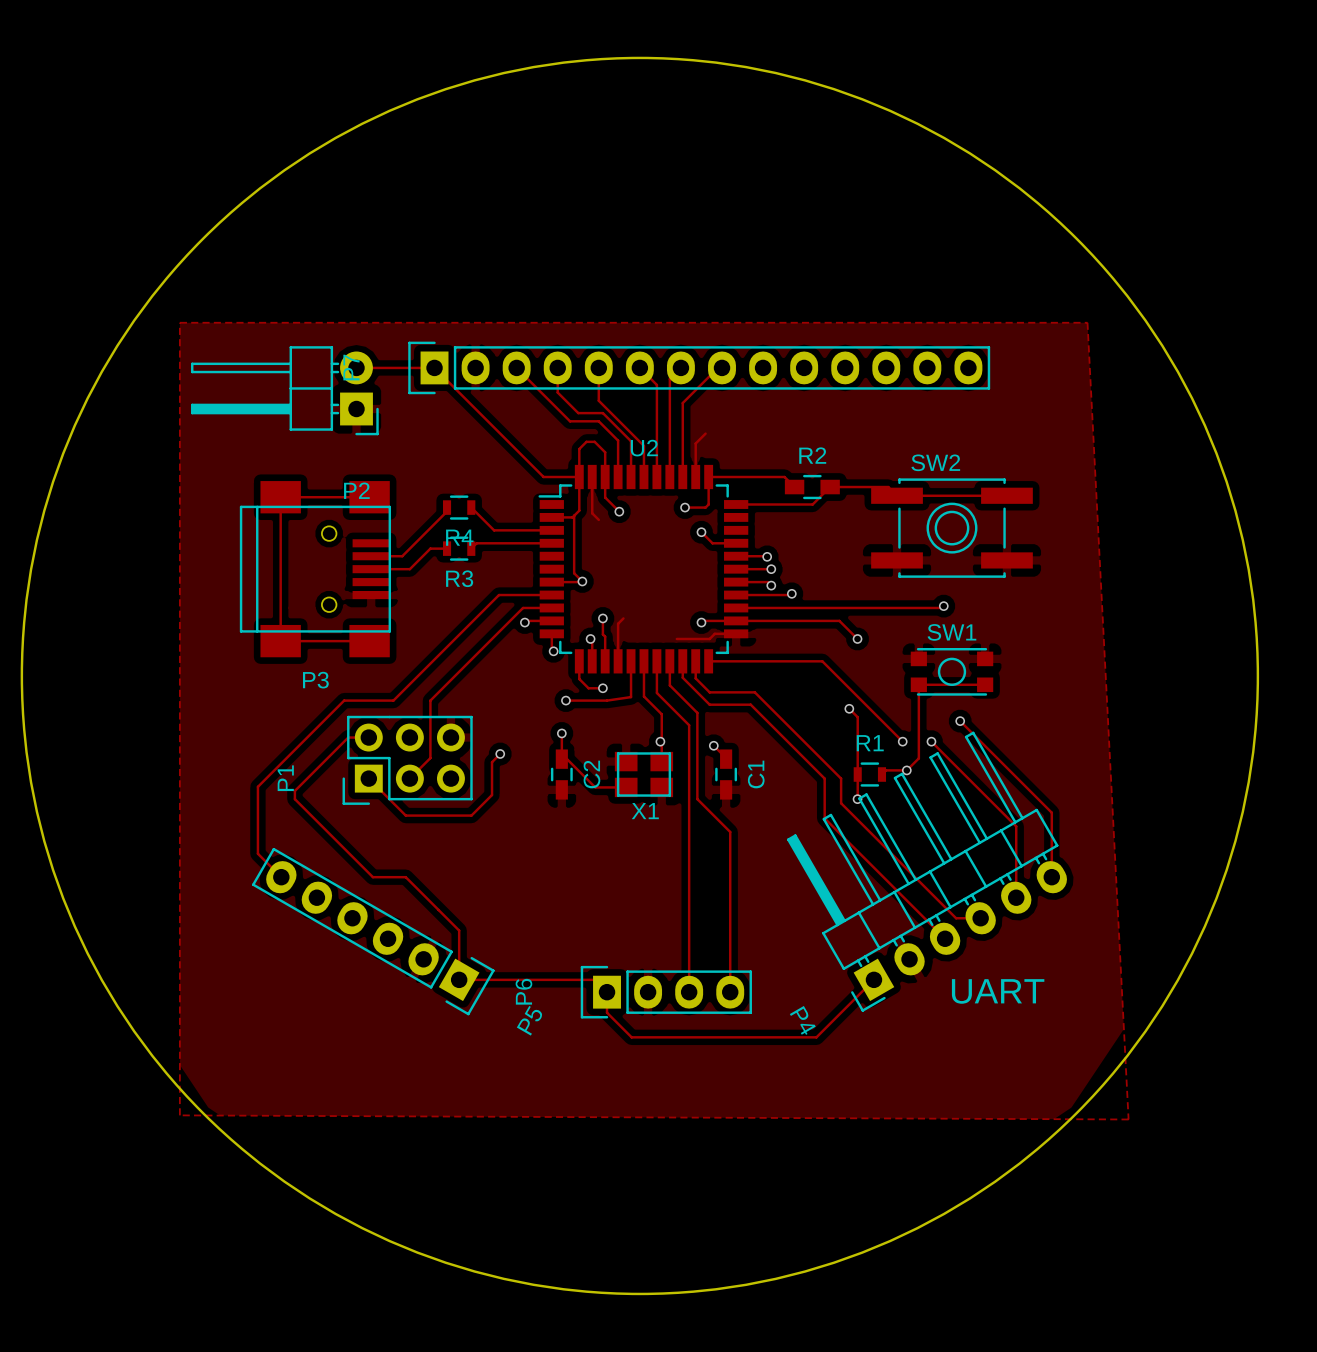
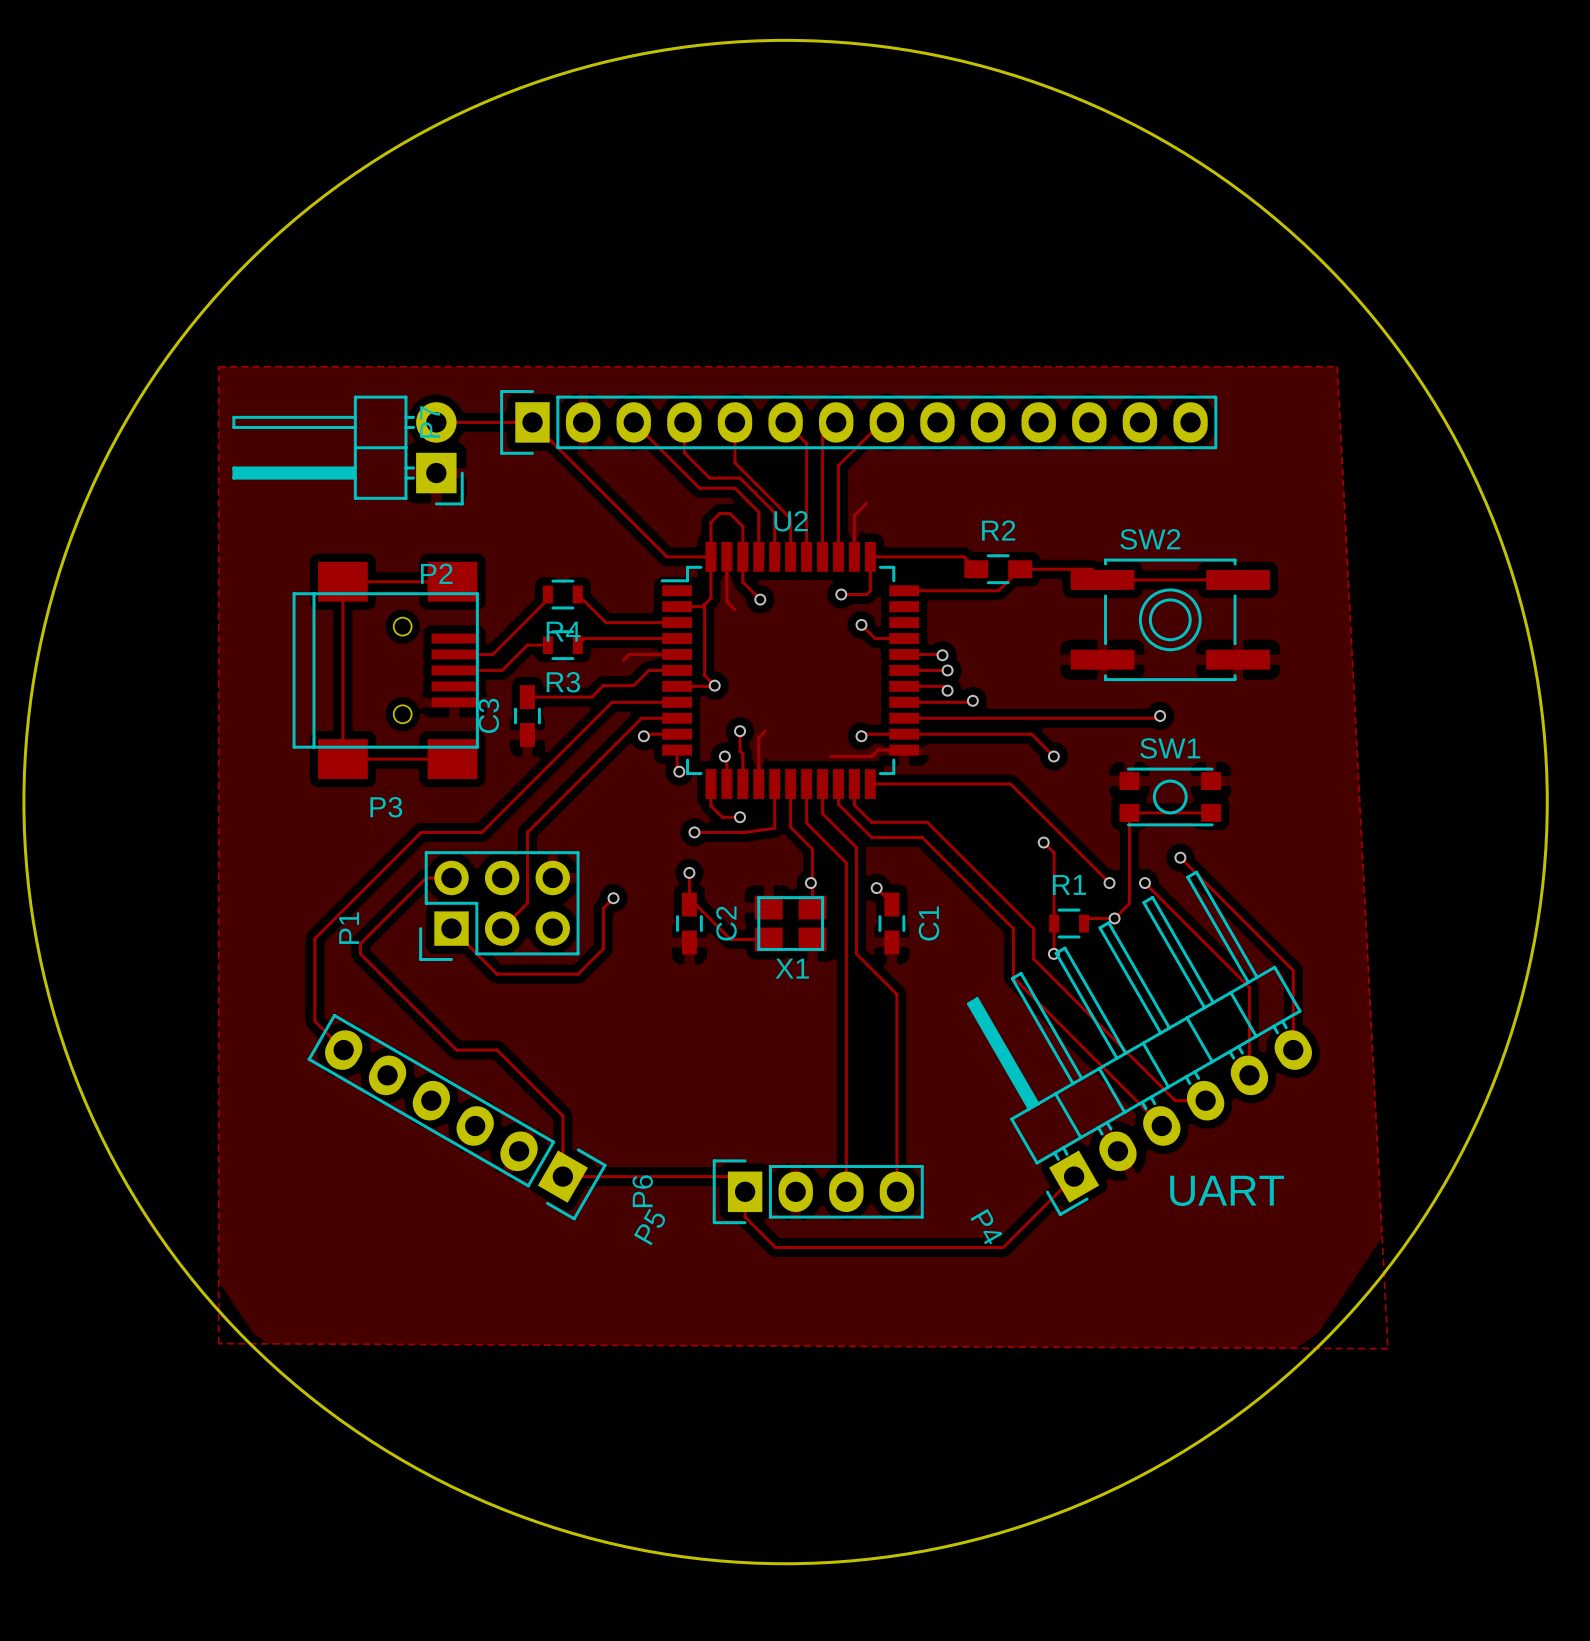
track: none -> (677, 654) (629, 654) (623, 660)
track: none -> (677, 670) (648, 670) (633, 685) (603, 685) (591, 697) (527, 697)
C3: none -> (527, 716)

